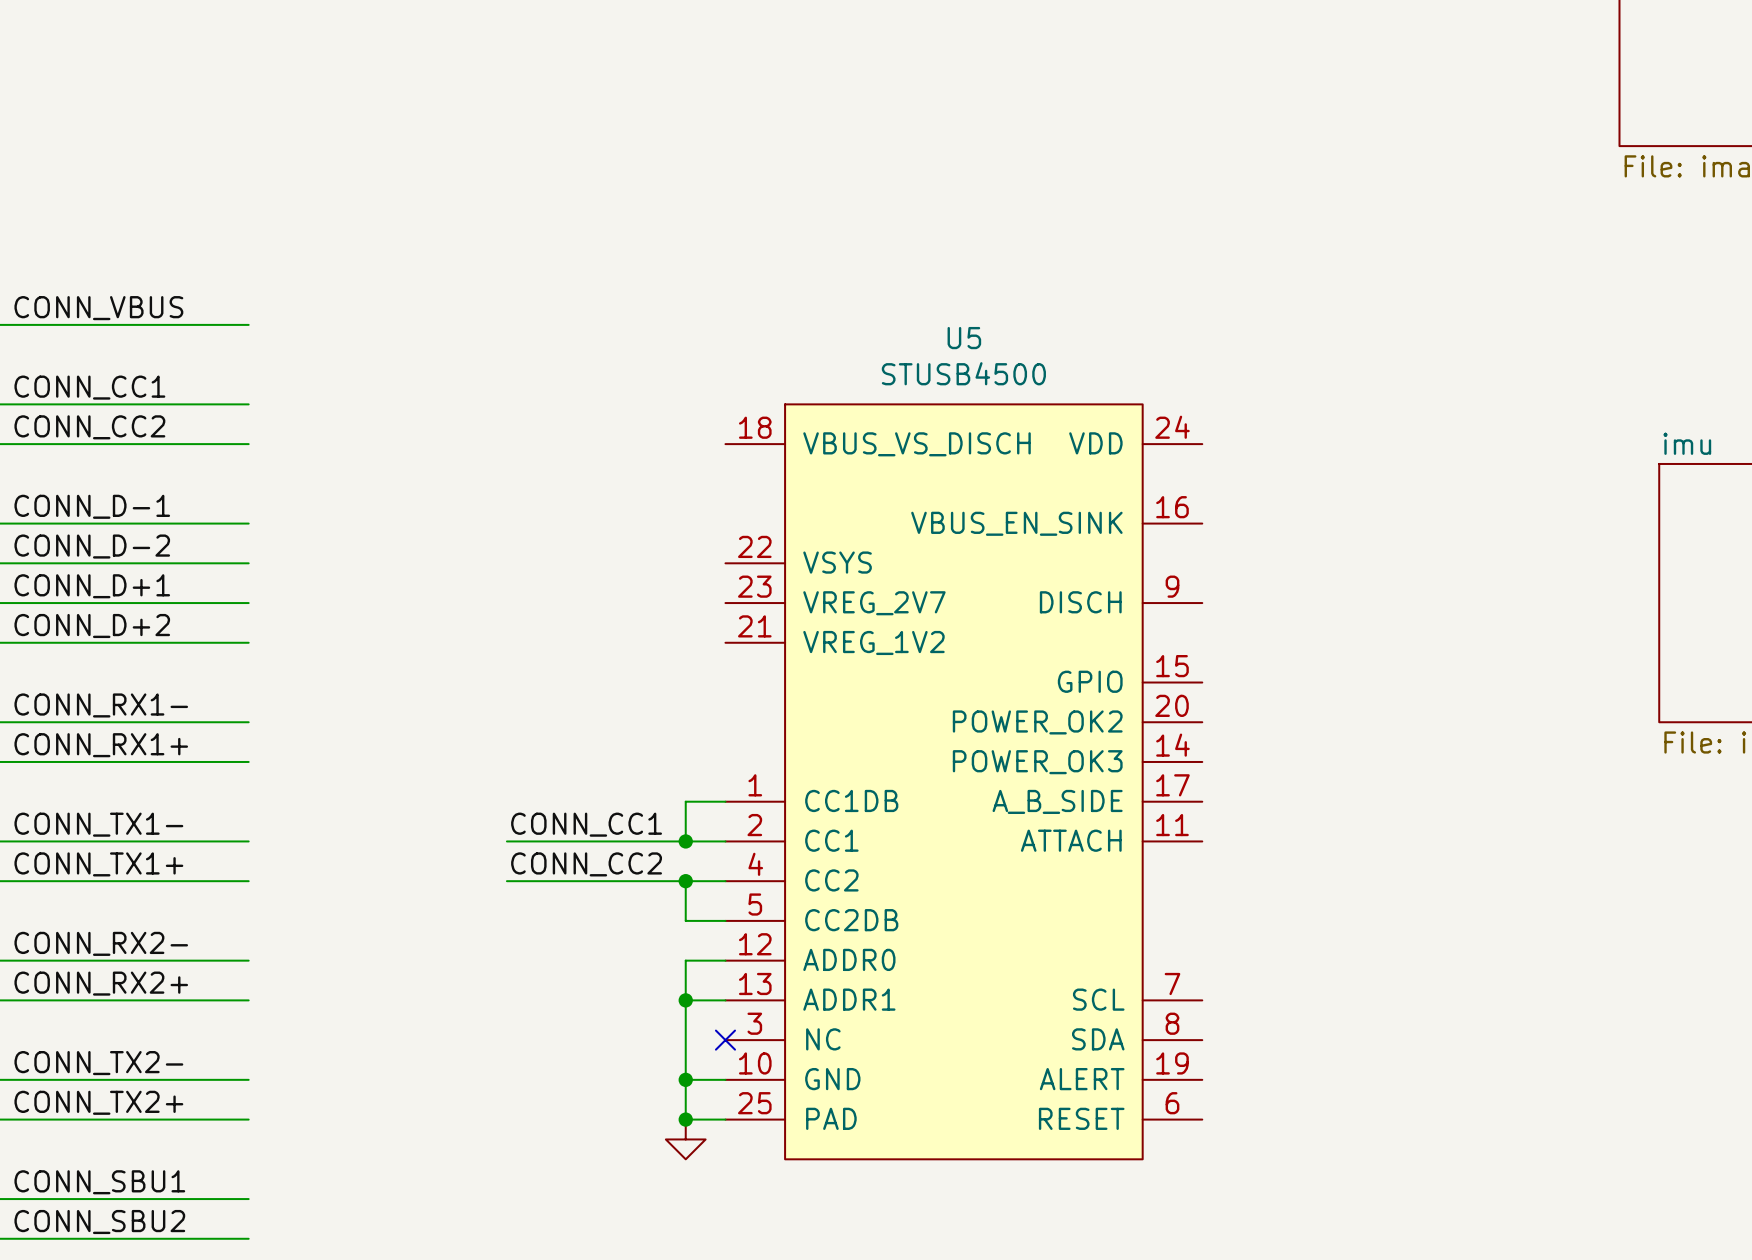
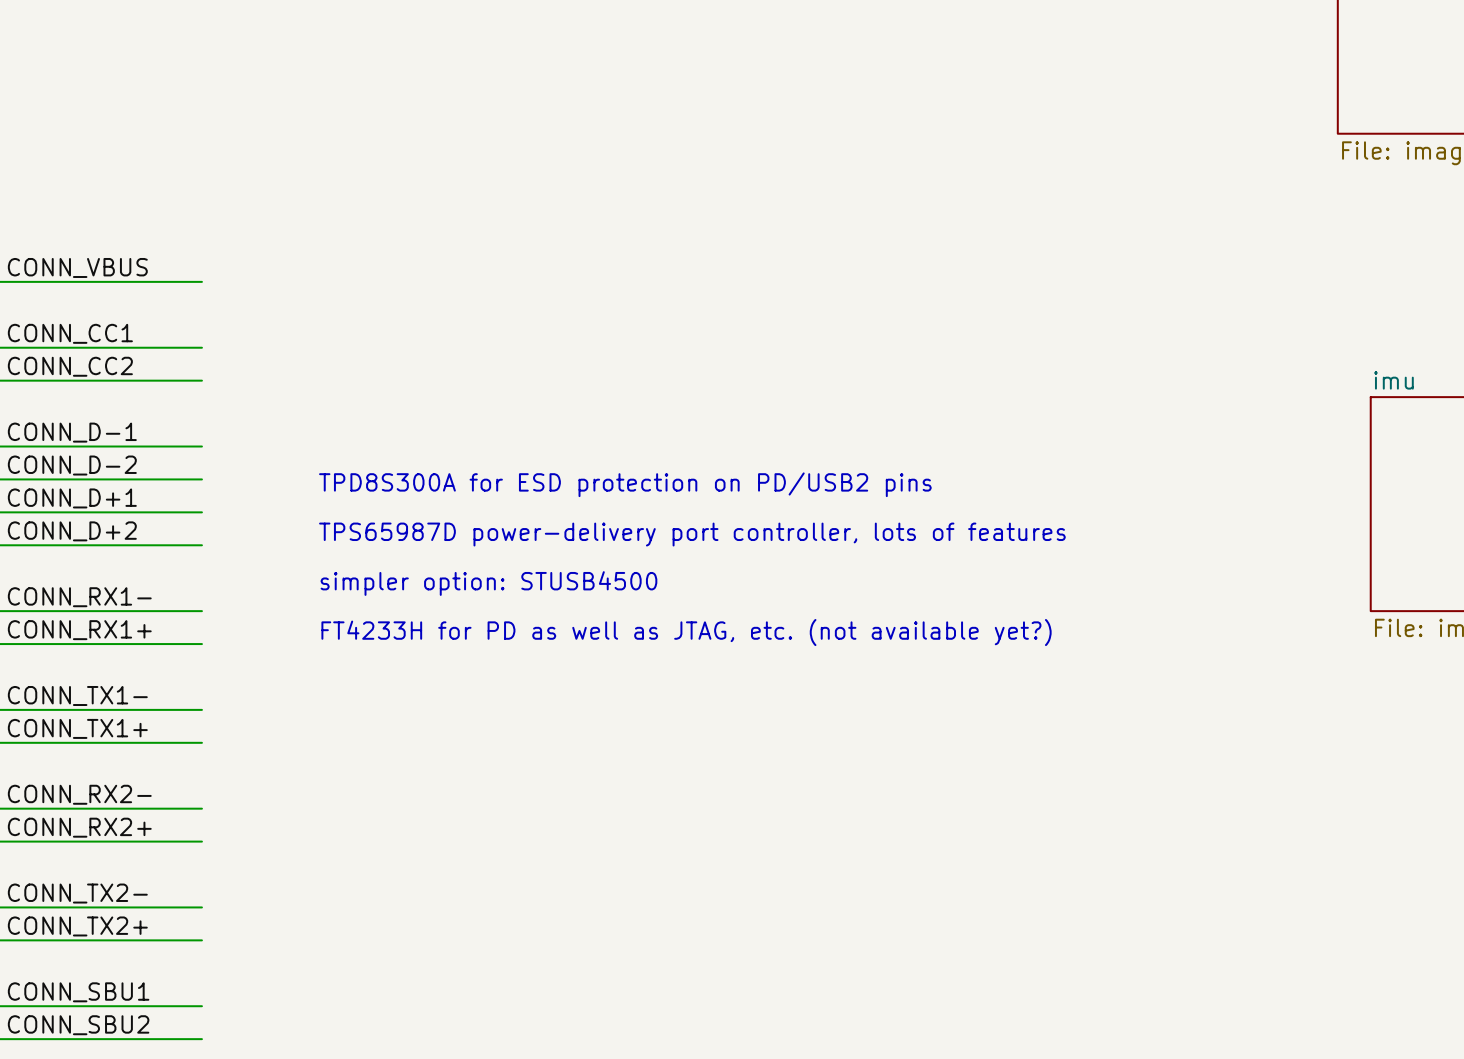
text: none -> TPD8S300A for ESD protection on PD/USB2 pins (625, 484)
text: none -> TPS65987D power-delivery port controller, lots of features (692, 534)
text: none -> simpler option: STUSB4500 (488, 583)
text: none -> FT4233H for PD as well as JTAG, etc. (not available yet?) (686, 632)
U5: STUSB4500 (963, 781) -> none
wire: (725, 801) (685, 801) (685, 841) -> none
label: CONN_CC1 (586, 824) -> none
wire: (506, 841) (725, 841) -> none
junction: (685, 841) -> none
label: CONN_CC2 (586, 864) -> none
wire: (506, 881) (725, 881) -> none
wire: (685, 881) (685, 920) (725, 920) -> none
junction: (685, 881) -> none
wire: (725, 960) (685, 960) (685, 1119) (725, 1119) -> none
wire: (685, 1000) (725, 1000) -> none
junction: (685, 1000) -> none
no-connect mark: (725, 1040) -> none
wire: (685, 1079) (725, 1079) -> none
junction: (685, 1079) -> none
junction: (685, 1119) -> none
power symbol: (685, 1139) -> none

